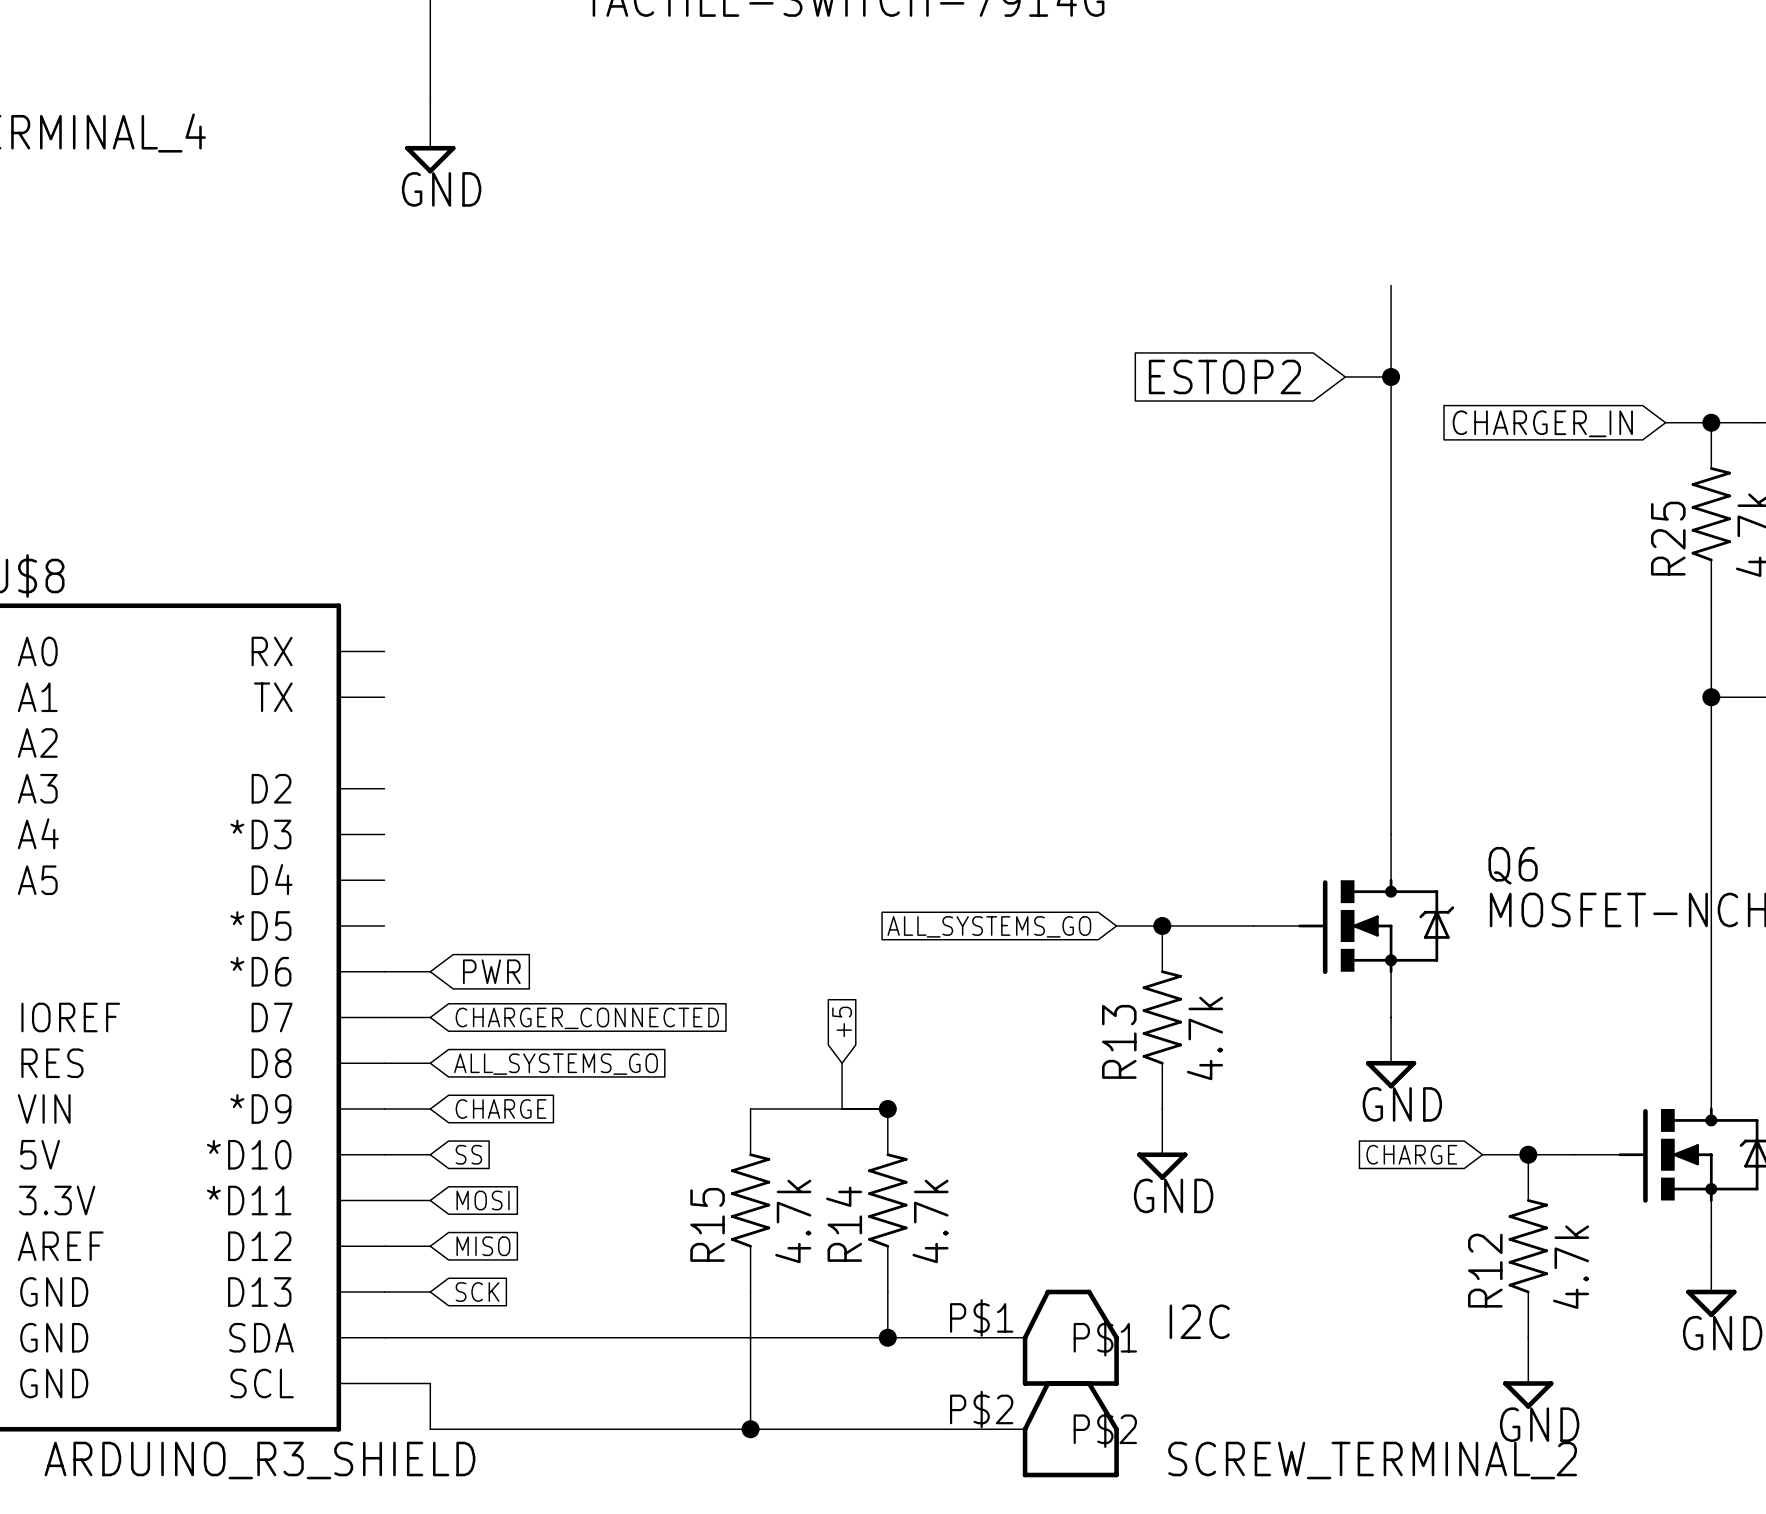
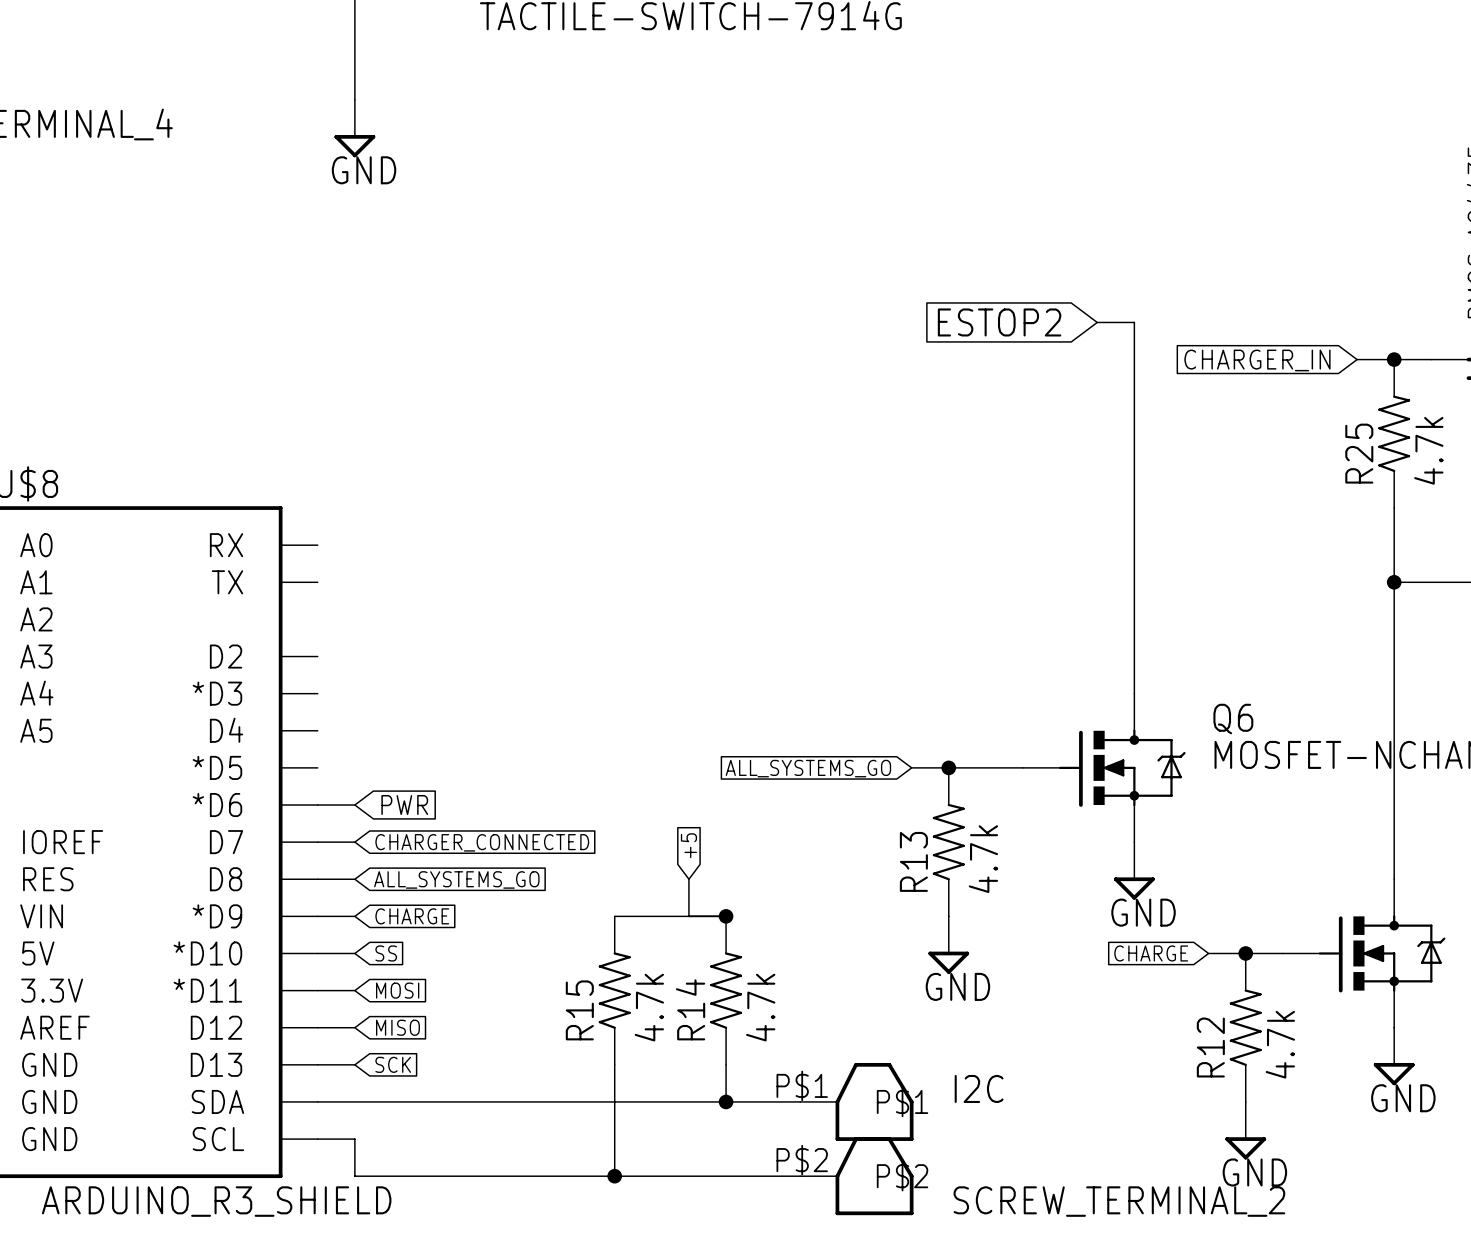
wire: (1391, 285) (1391, 376) -> none
junction: (1391, 376) -> none

